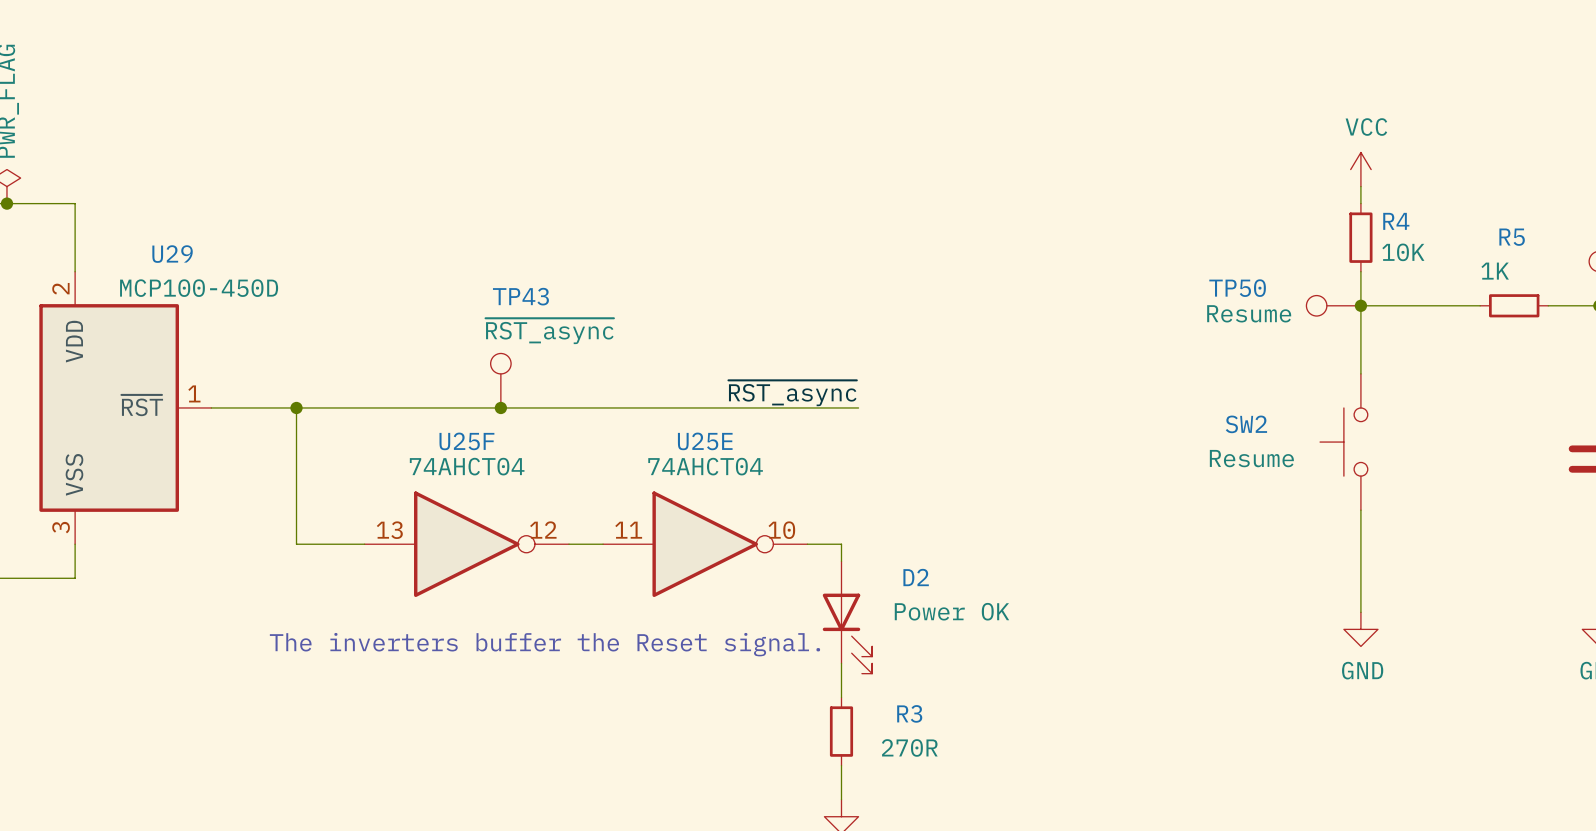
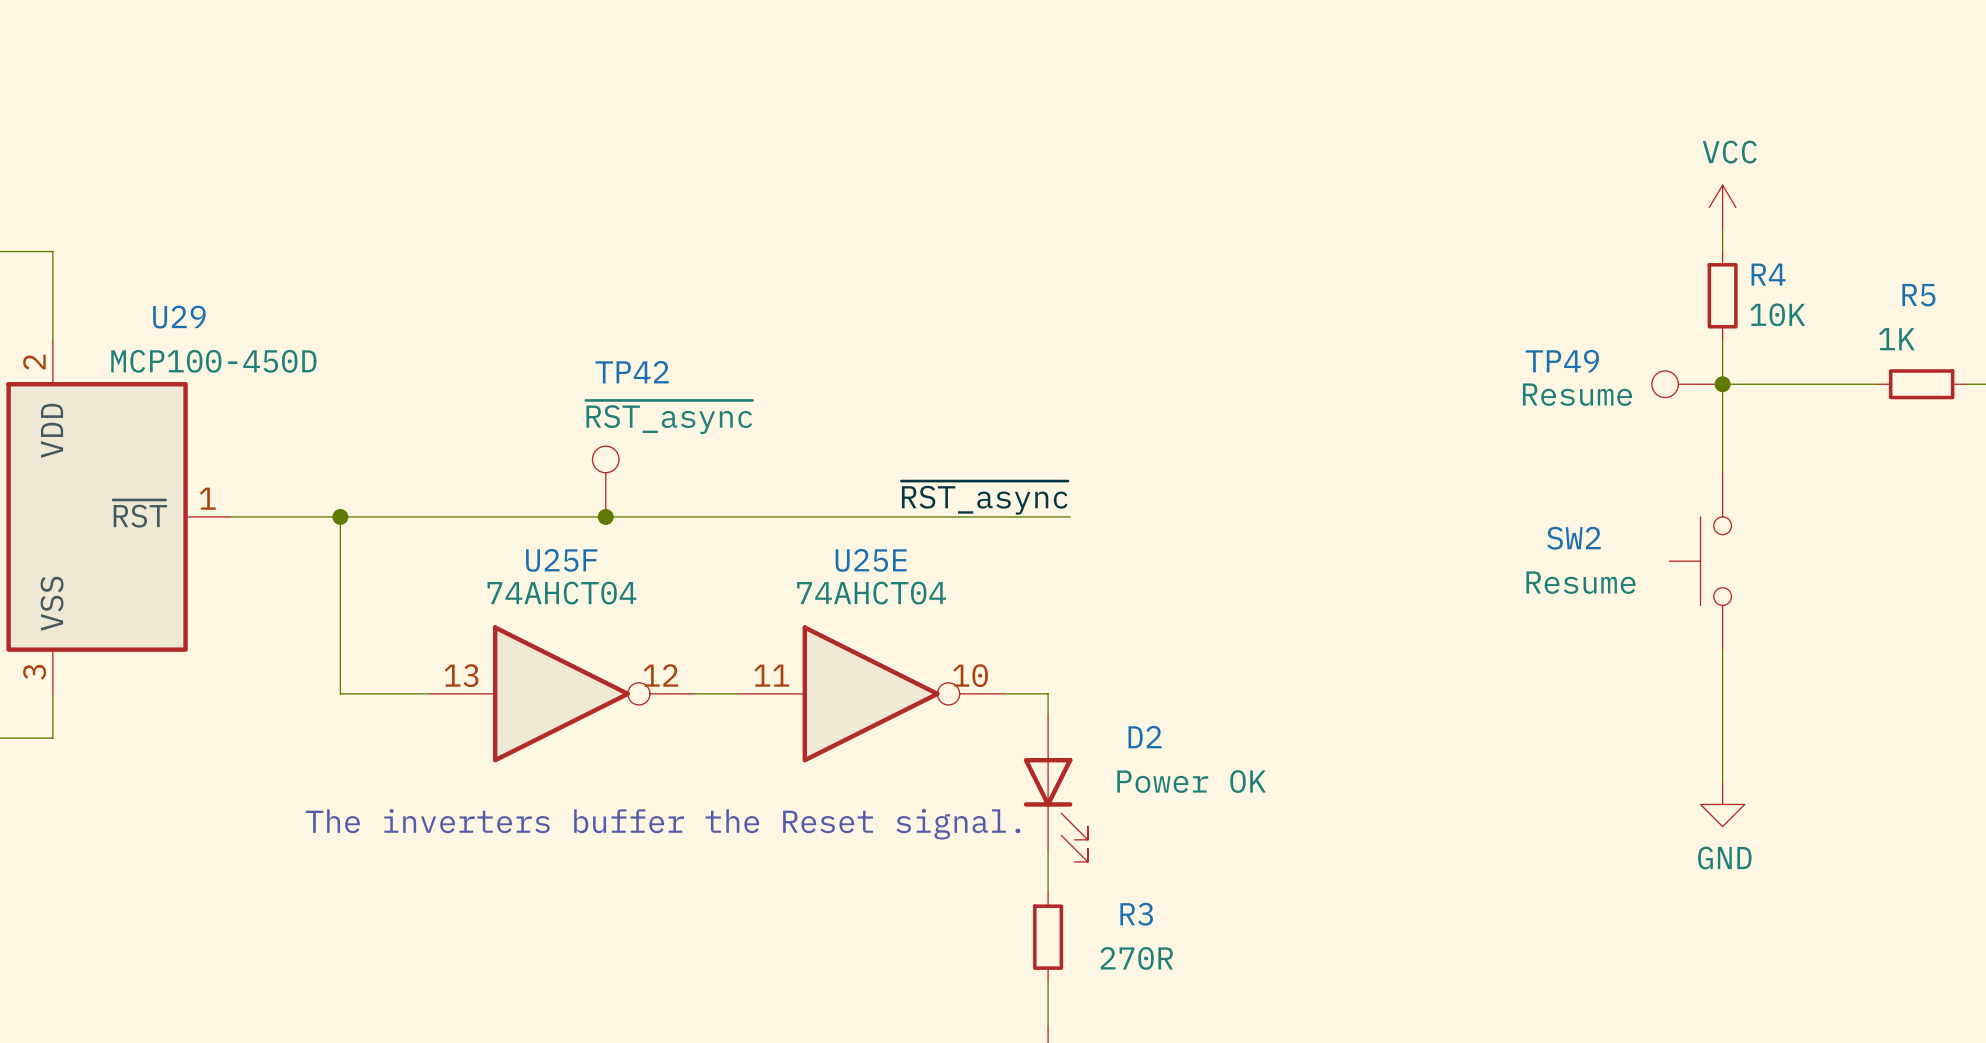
TP50 name: TP50 (1237, 288) -> TP49 (1562, 361)
TP43 name: TP43 (520, 296) -> TP42 (632, 372)

